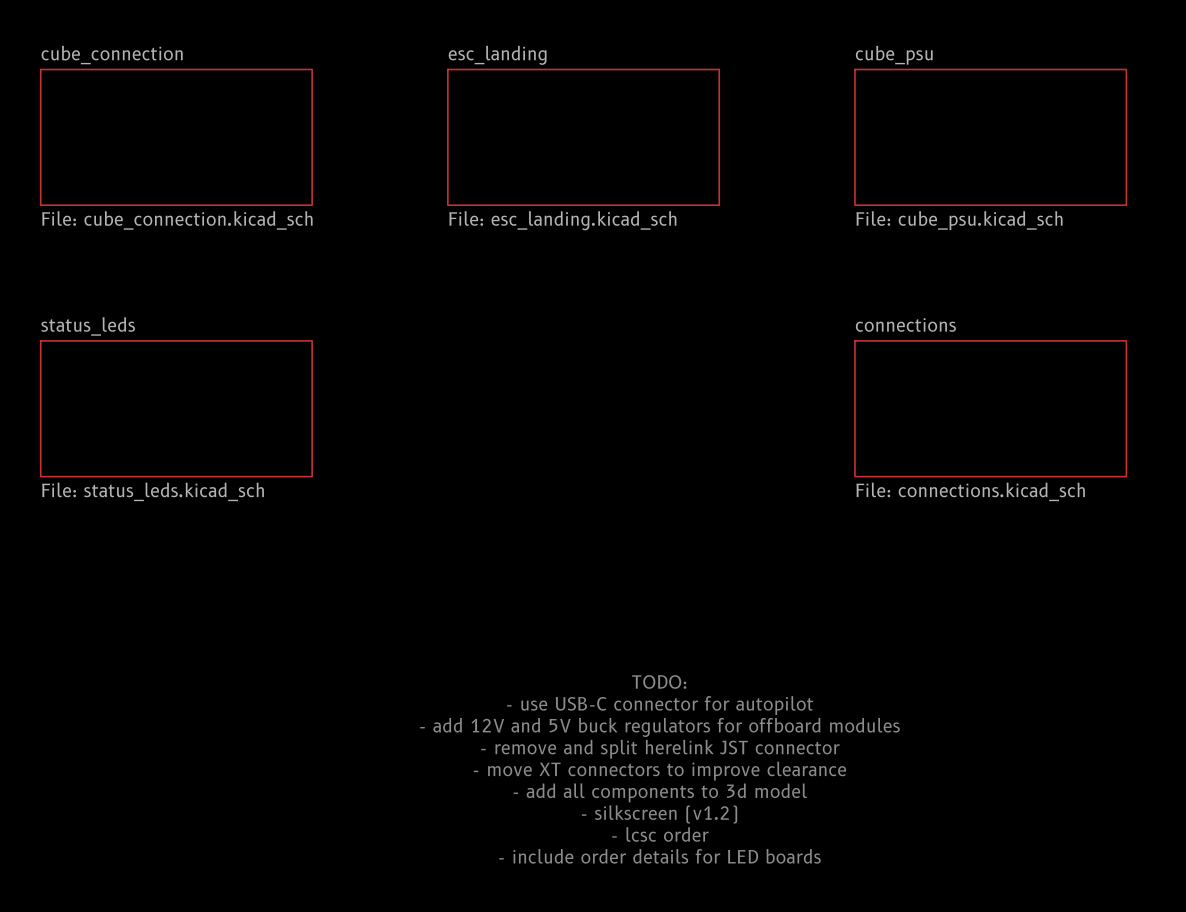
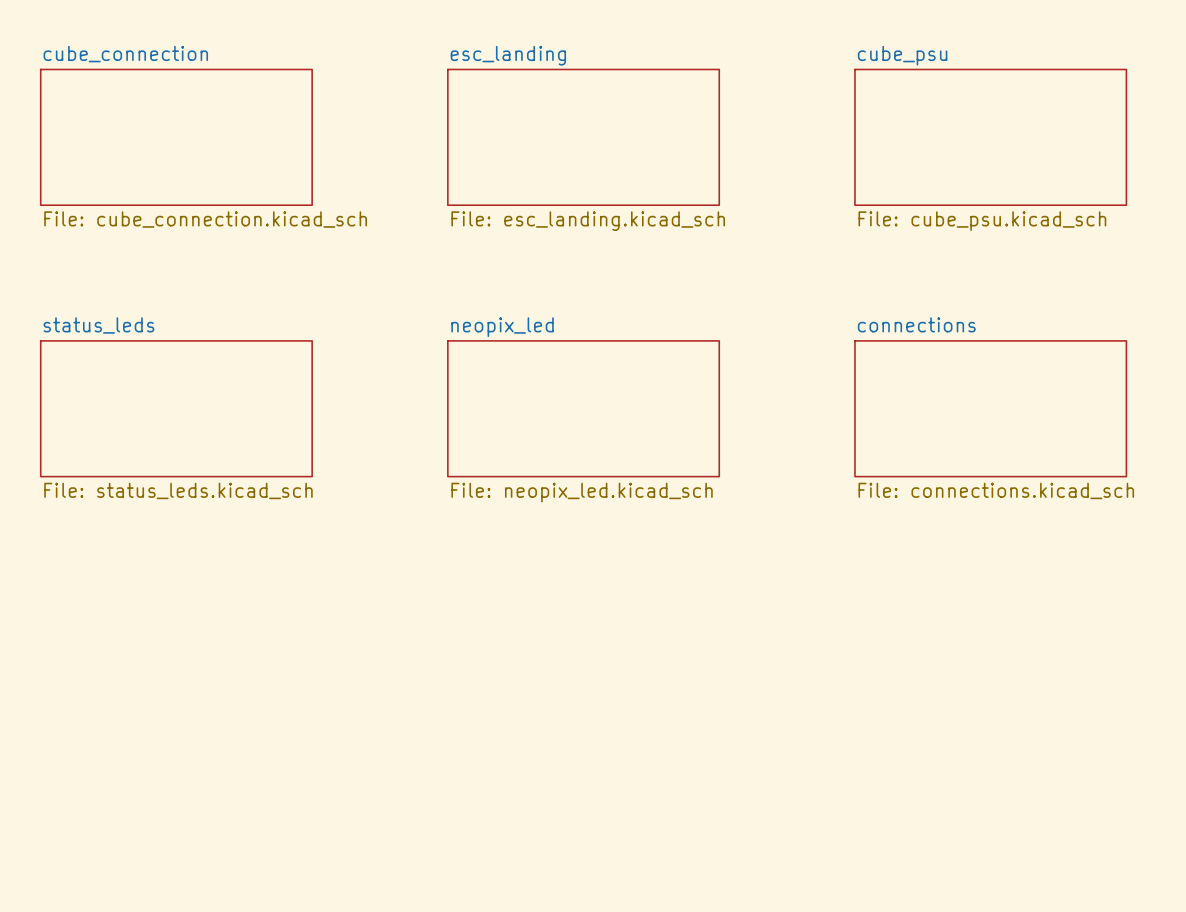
sheet neopix_led: none -> File: neopix_led.kicad_sch (583, 408)
text: TODO: (659, 681) -> none
text: - use USB-C connector for autopilot (660, 705) -> none
text: - add 12V and 5V buck regulators for offboard modules (660, 727) -> none
text: - remove and split herelink JST connector (660, 749) -> none
text: - move XT connectors to improve clearance (659, 771) -> none
text: - add all components to 3d model (660, 792) -> none
text: - silkscreen (v1.2) (659, 814) -> none
text: - lcsc order (660, 834) -> none
text: - include order details for LED boards (660, 856) -> none

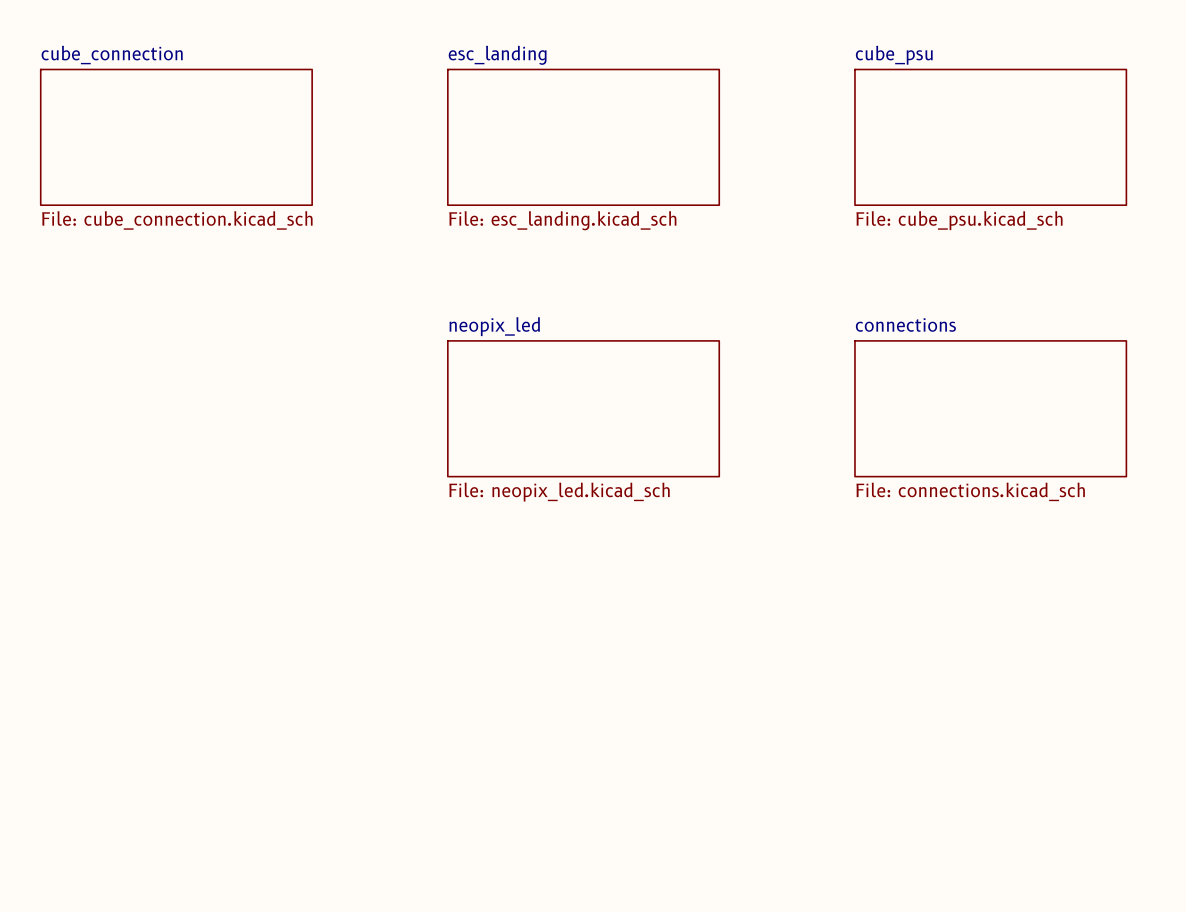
sheet status_leds: File: status_leds.kicad_sch (176, 408) -> none

